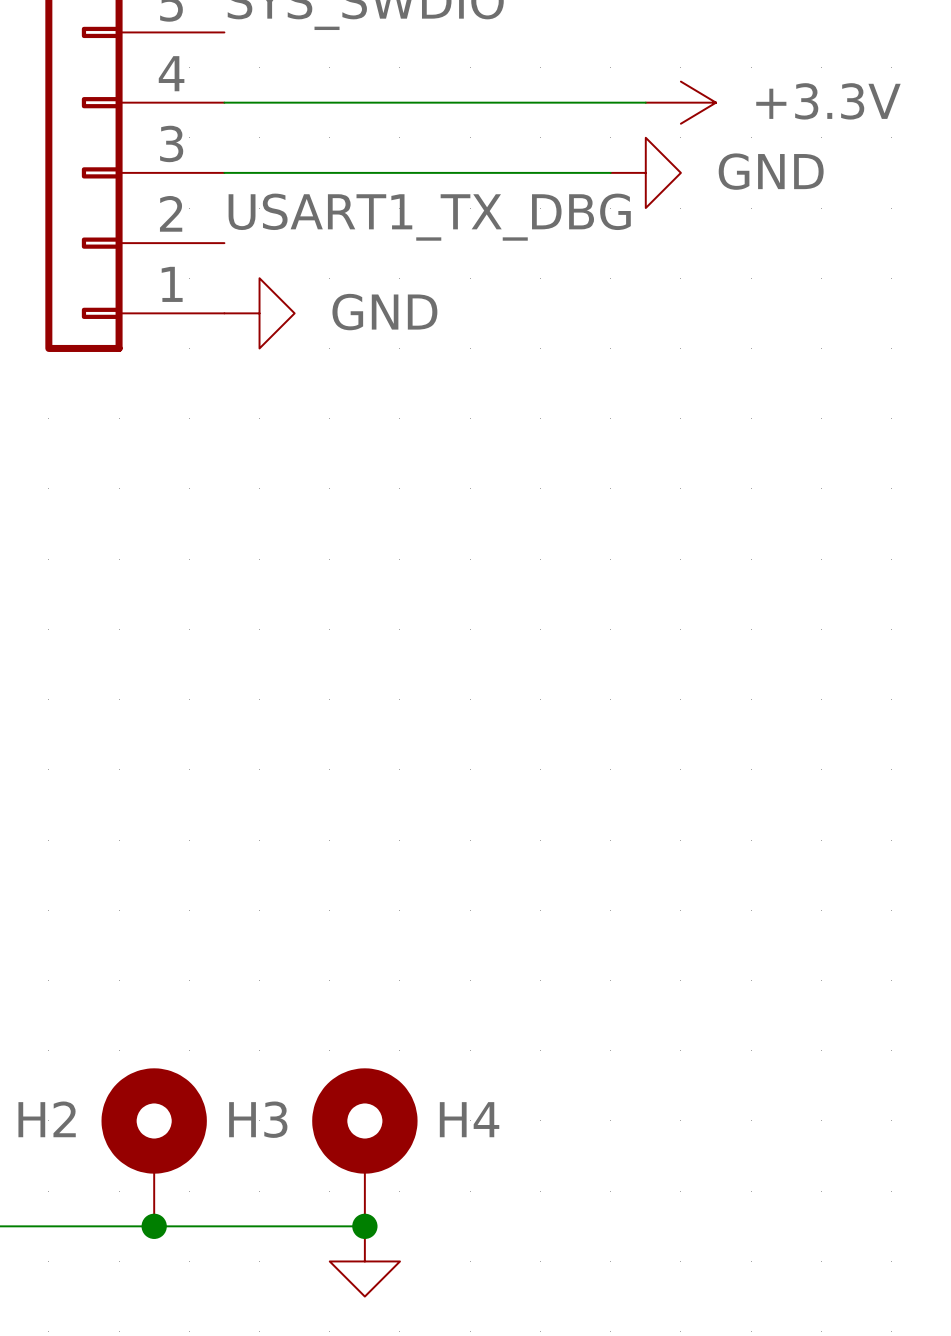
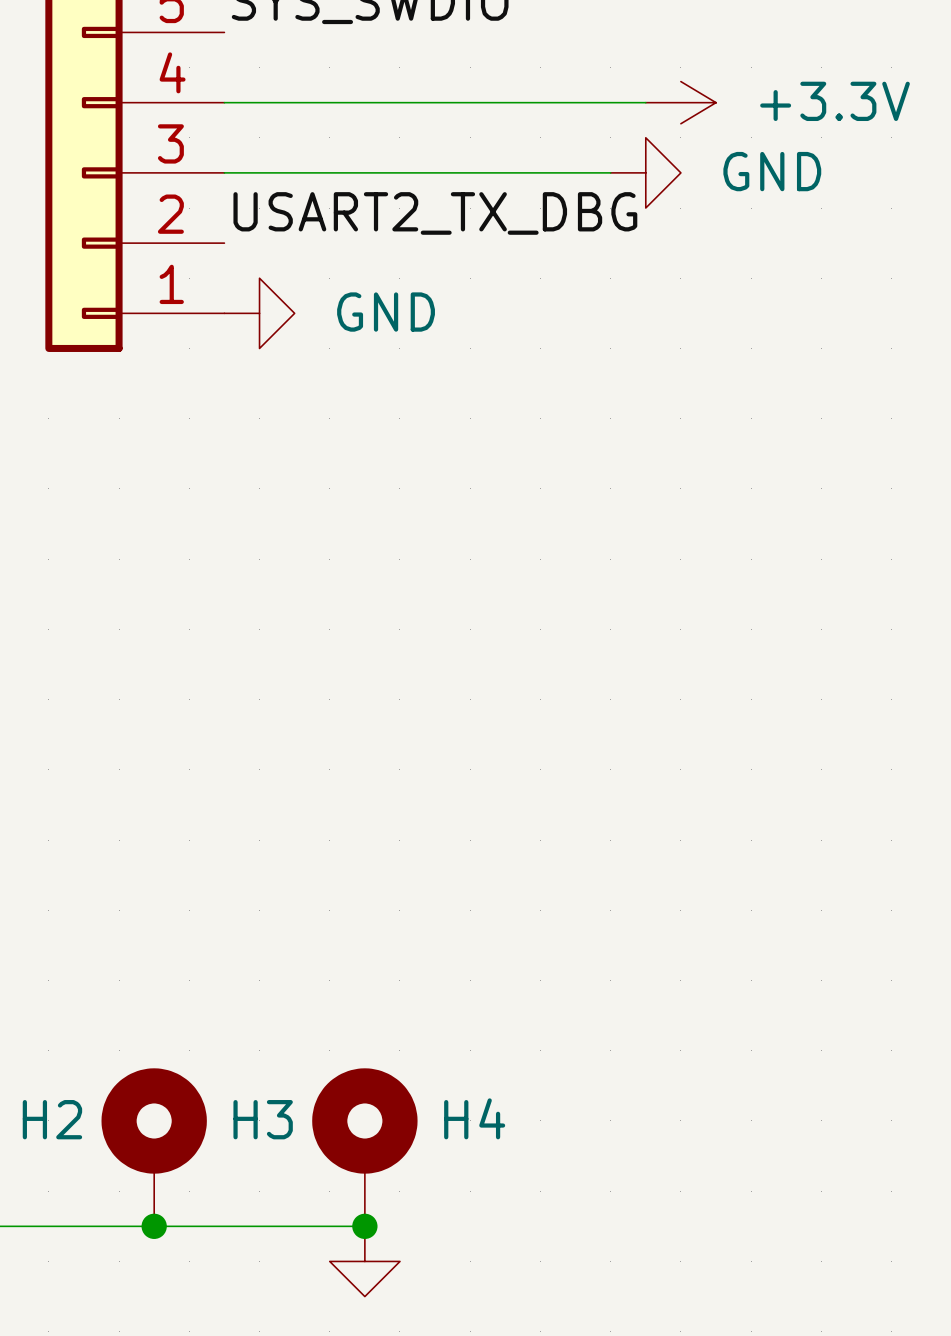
label: USART1_TX_DBG (429, 217) -> USART2_TX_DBG (435, 213)

